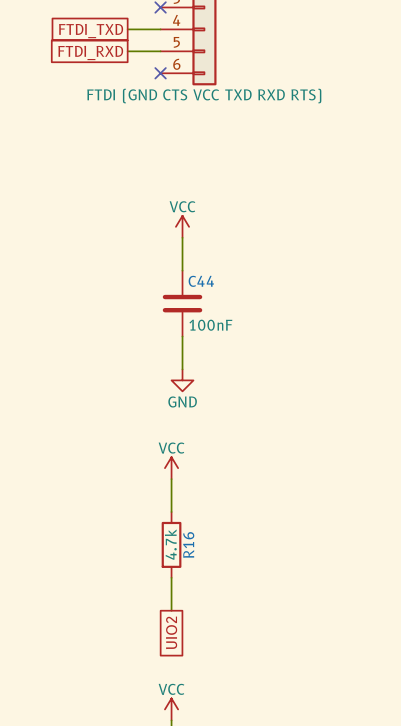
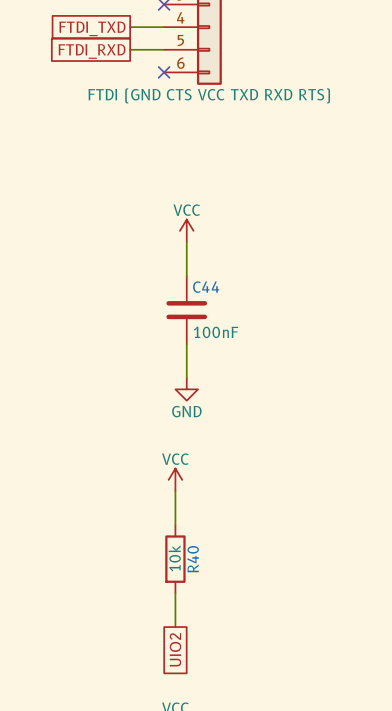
R16 value: 4.7k (170, 544) -> 10k (174, 558)
R16 name: R16 (188, 544) -> R40 (193, 559)

